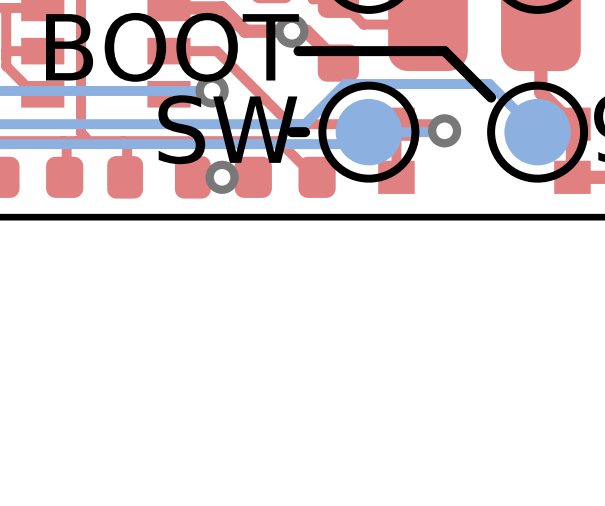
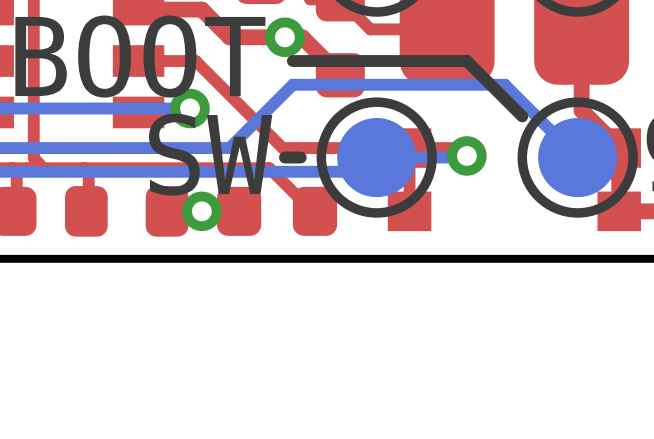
bottom track: (489, 84) (345, 84) (305, 124) (245, 124) -> (520, 100) (504, 84) (292, 84) (229, 148)

